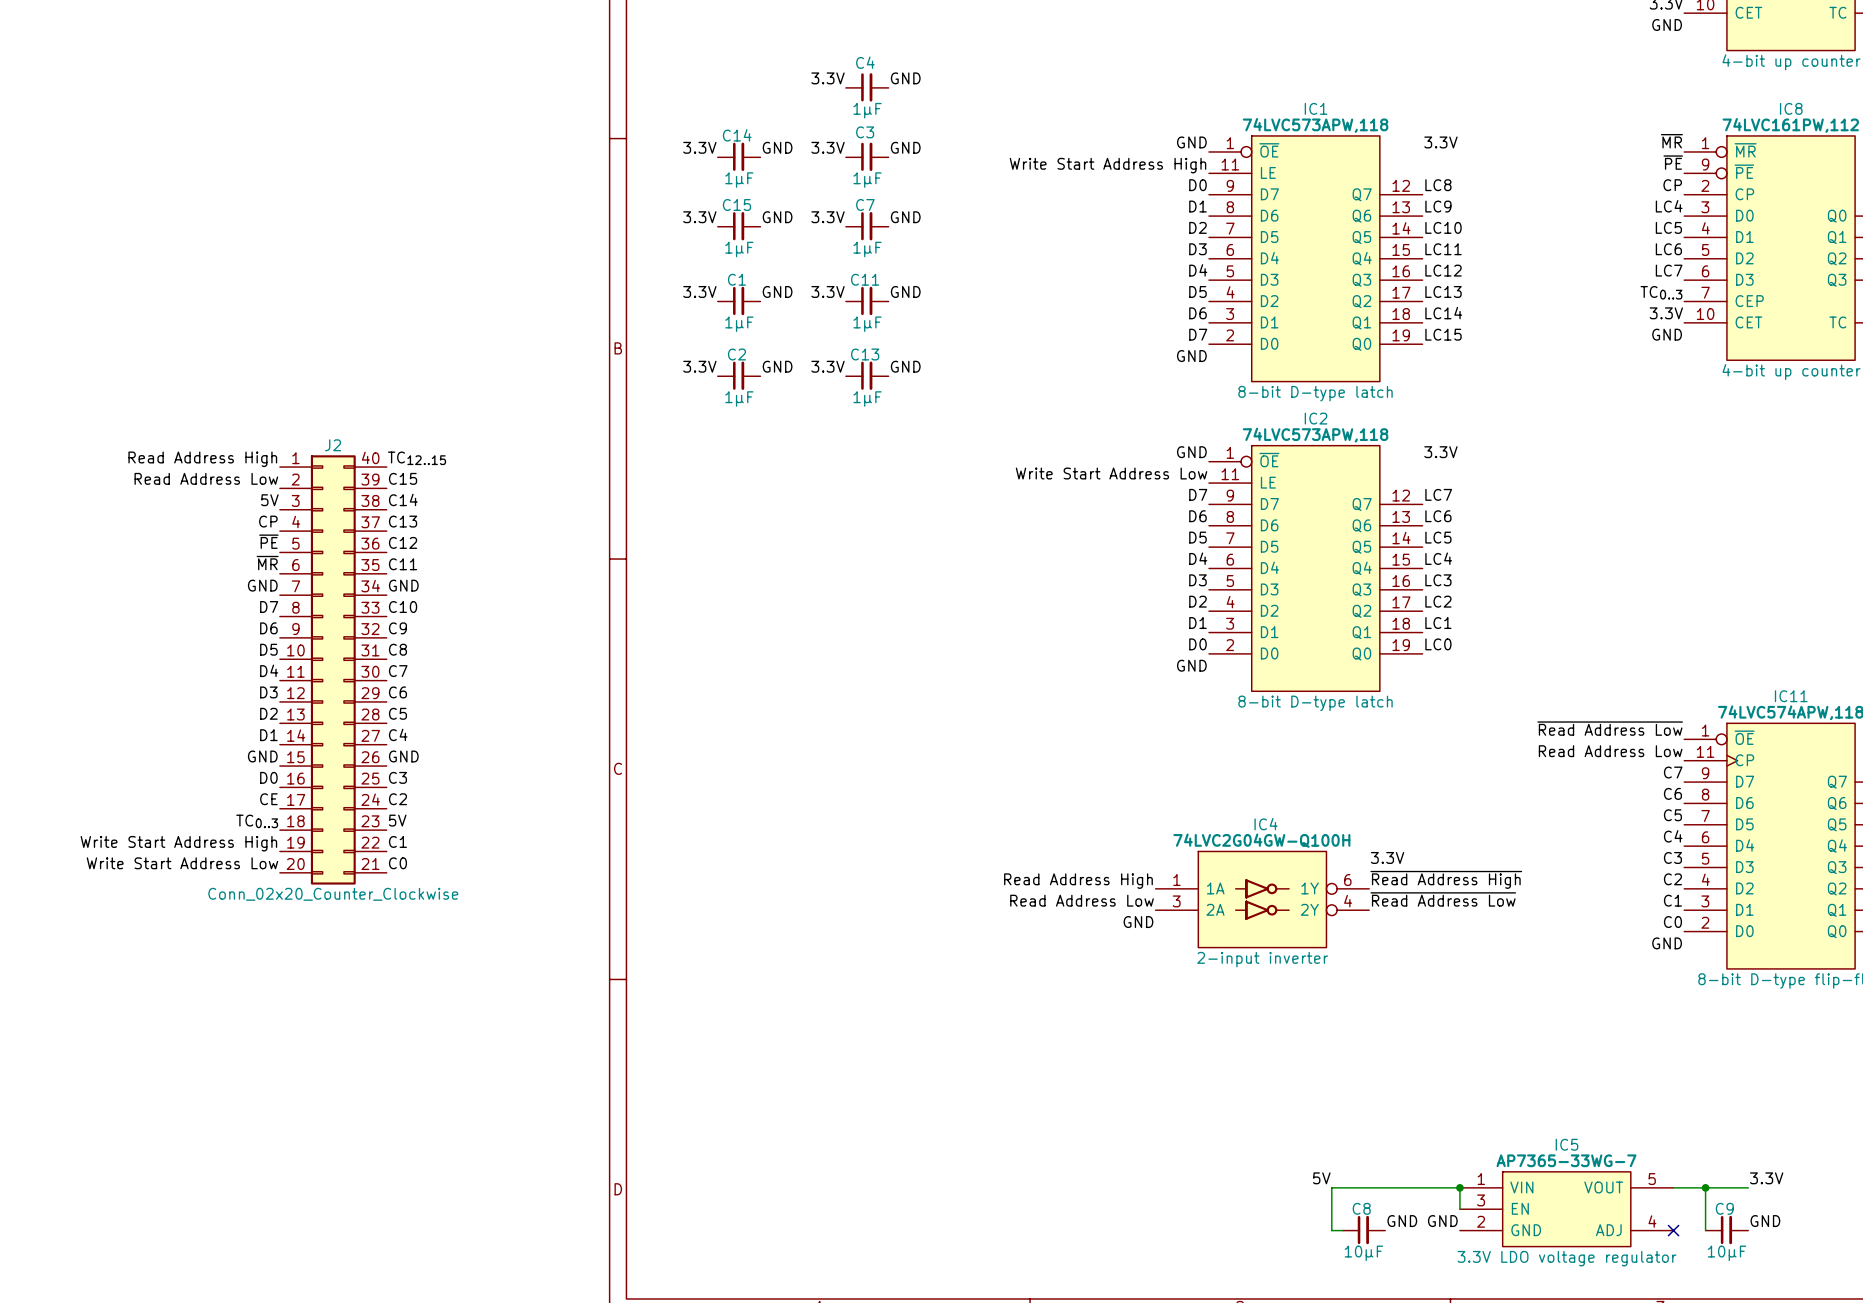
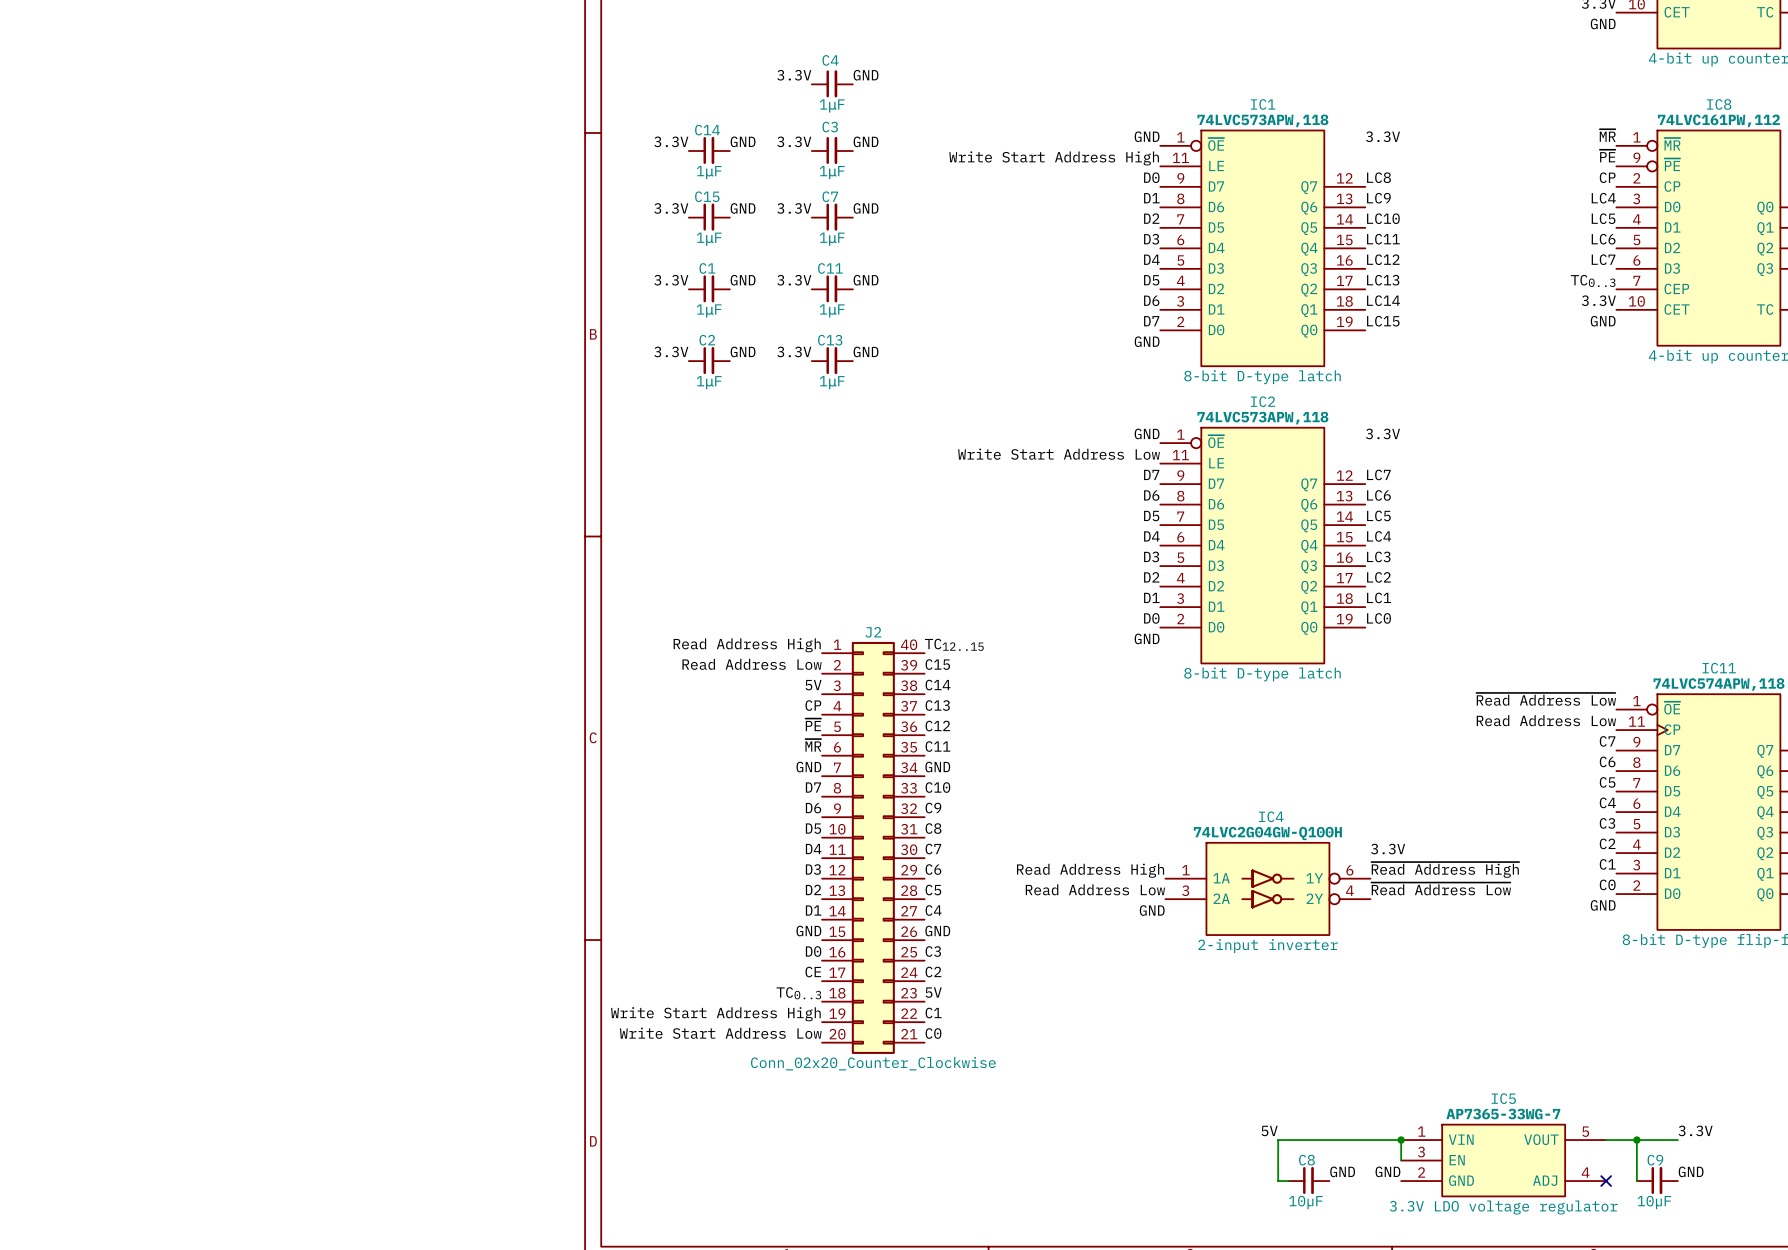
label: TC12..15 (416, 458) -> none
label: Read Address High (202, 459) -> none
label: Read Address Low (206, 478) -> none
label: C15 (403, 478) -> none
label: C14 (403, 499) -> none
label: 5V (269, 500) -> none
label: CP (268, 521) -> none
label: C13 (403, 521) -> none
label: ~{PE} (268, 541) -> none
label: C12 (403, 542) -> none
label: ~{MR} (267, 563) -> none
label: C11 (403, 564) -> none
label: GND (262, 585) -> none
label: GND (403, 585) -> none
label: D7 (269, 607) -> none
label: C10 (403, 607) -> none
label: D6 (268, 628) -> none
label: C9 (397, 628) -> none
label: D5 (268, 649) -> none
label: C8 (397, 649) -> none
J2 position: (333, 669) -> (873, 847)
label: D4 (269, 670) -> none
label: C7 (398, 671) -> none
label: none -> TC12..15 (954, 644)
label: none -> Read Address High (747, 645)
label: D3 (268, 692) -> none
label: C6 (397, 692) -> none
label: none -> Read Address Low (752, 664)
label: none -> C15 (937, 664)
label: D2 (268, 713) -> none
label: C5 (397, 713) -> none
label: none -> 5V (813, 685)
label: none -> C14 (938, 685)
label: C4 (398, 734) -> none
label: D1 (268, 735) -> none
label: none -> CP (813, 705)
label: none -> C13 (937, 705)
label: none -> ~{PE} (813, 724)
label: GND (262, 756) -> none
label: GND (403, 756) -> none
label: none -> C12 (937, 726)
label: none -> ~{MR} (813, 745)
label: D0 (268, 777) -> none
label: C3 (397, 777) -> none
label: none -> C11 (937, 746)
label: CE (268, 799) -> none
label: C2 (397, 799) -> none
label: none -> GND (808, 767)
label: none -> GND (937, 767)
label: 5V (397, 820) -> none
label: none -> D7 (813, 787)
label: none -> C10 (937, 787)
label: TC0..3 (257, 821) -> none
label: C1 (397, 841) -> none
label: none -> D6 (813, 808)
label: none -> C9 (933, 808)
label: Write Start Address High (178, 843) -> none
label position: 3.3V (1387, 857) -> 3.3V (1388, 849)
label: Write Start Address Low (182, 863) -> none
label: C0 (397, 863) -> none
label: none -> D5 (813, 828)
label: none -> C8 (933, 828)
label position: ~{Read Address High} (1446, 879) -> ~{Read Address High} (1445, 869)
label position: Read Address High (1078, 881) -> Read Address High (1090, 870)
label: none -> D4 (813, 849)
label: none -> C7 (933, 849)
IC4 position: (1262, 899) -> (1267, 888)
label position: ~{Read Address Low} (1443, 899) -> ~{Read Address Low} (1441, 888)
label position: Read Address Low (1082, 900) -> Read Address Low (1095, 889)
label: none -> D3 (813, 869)
label: none -> C6 (933, 869)
label position: GND (1138, 922) -> GND (1152, 910)
label: none -> D2 (813, 889)
label: none -> C5 (933, 890)
label: none -> D1 (813, 910)
label: none -> C4 (933, 910)
label: none -> GND (808, 931)
label: none -> GND (937, 931)
label: none -> D0 (813, 951)
label: none -> C3 (933, 951)
label: none -> CE (813, 972)
label: none -> C2 (933, 972)
label: none -> TC0..3 (798, 993)
label: none -> 5V (933, 992)
label: none -> C1 (933, 1013)
label: none -> Write Start Address High (715, 1014)
label: none -> Write Start Address Low (720, 1033)
label: none -> C0 (933, 1033)

